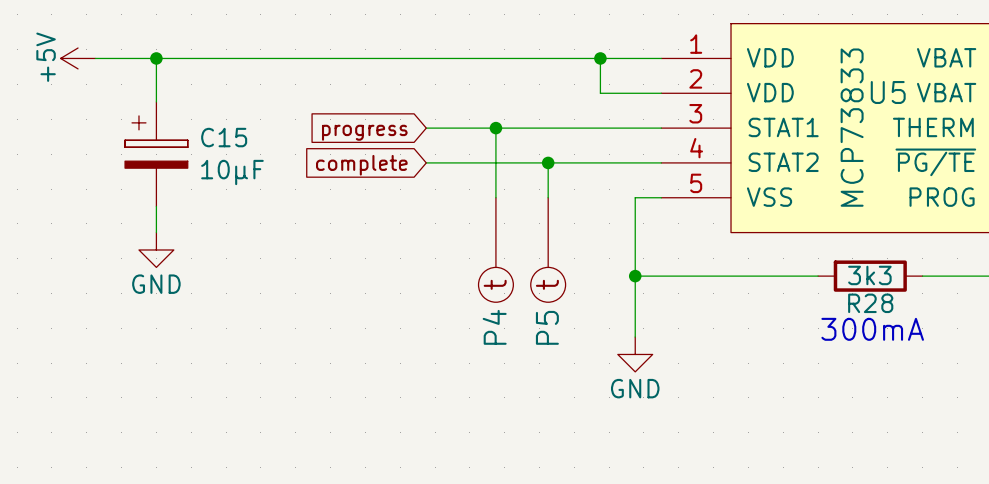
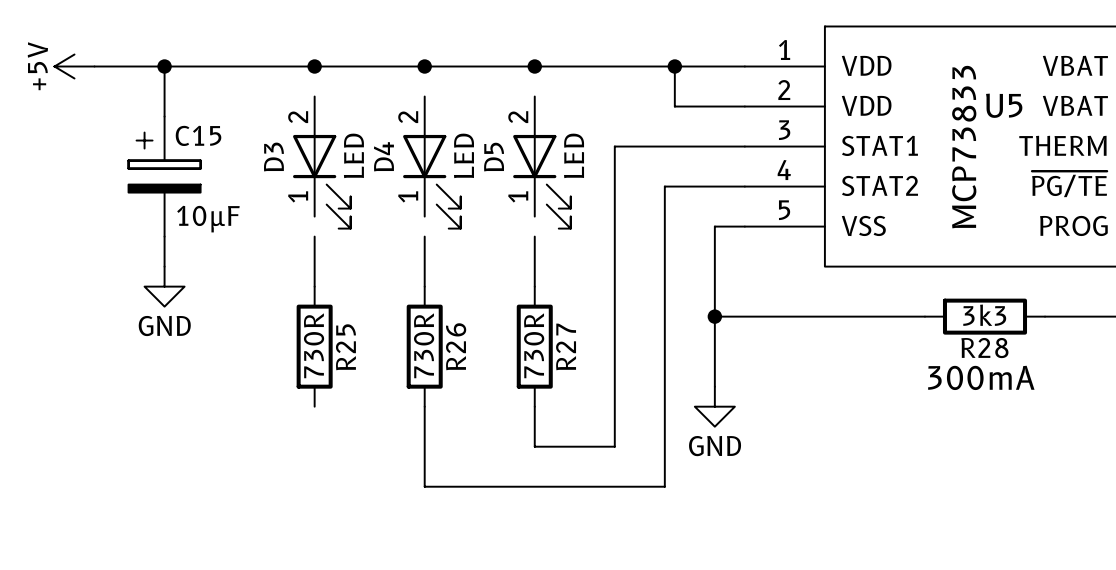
junction: none -> (314, 66)
junction: none -> (424, 66)
junction: none -> (534, 66)
wire: (426, 128) (548, 128) -> (614, 186) (614, 146)
wire: (495, 128) (495, 197) -> none
junction: (495, 128) -> none
global label: progress (364, 132) -> none
C15 name position: C15 (224, 137) -> C15 (198, 135)
D3: none -> LED (321, 162)
D4: none -> LED (431, 162)
D5: none -> LED (541, 162)
wire: (426, 162) (591, 162) -> (424, 406) (424, 486) (664, 486) (664, 186)
junction: (548, 162) -> none
global label: complete (361, 165) -> none
C15 value position: 10µF (232, 172) -> 10µF (208, 219)
wire: none -> (614, 226) (614, 446) (534, 446) (534, 406)
wire: none -> (314, 236) (314, 286)
wire: none -> (424, 236) (424, 286)
wire: none -> (534, 236) (534, 286)
P4: (495, 249) -> none
P5: (548, 249) -> none
R25: none -> 730R (314, 346)
R26: none -> 730R (424, 346)
R27: none -> 730R (534, 346)

